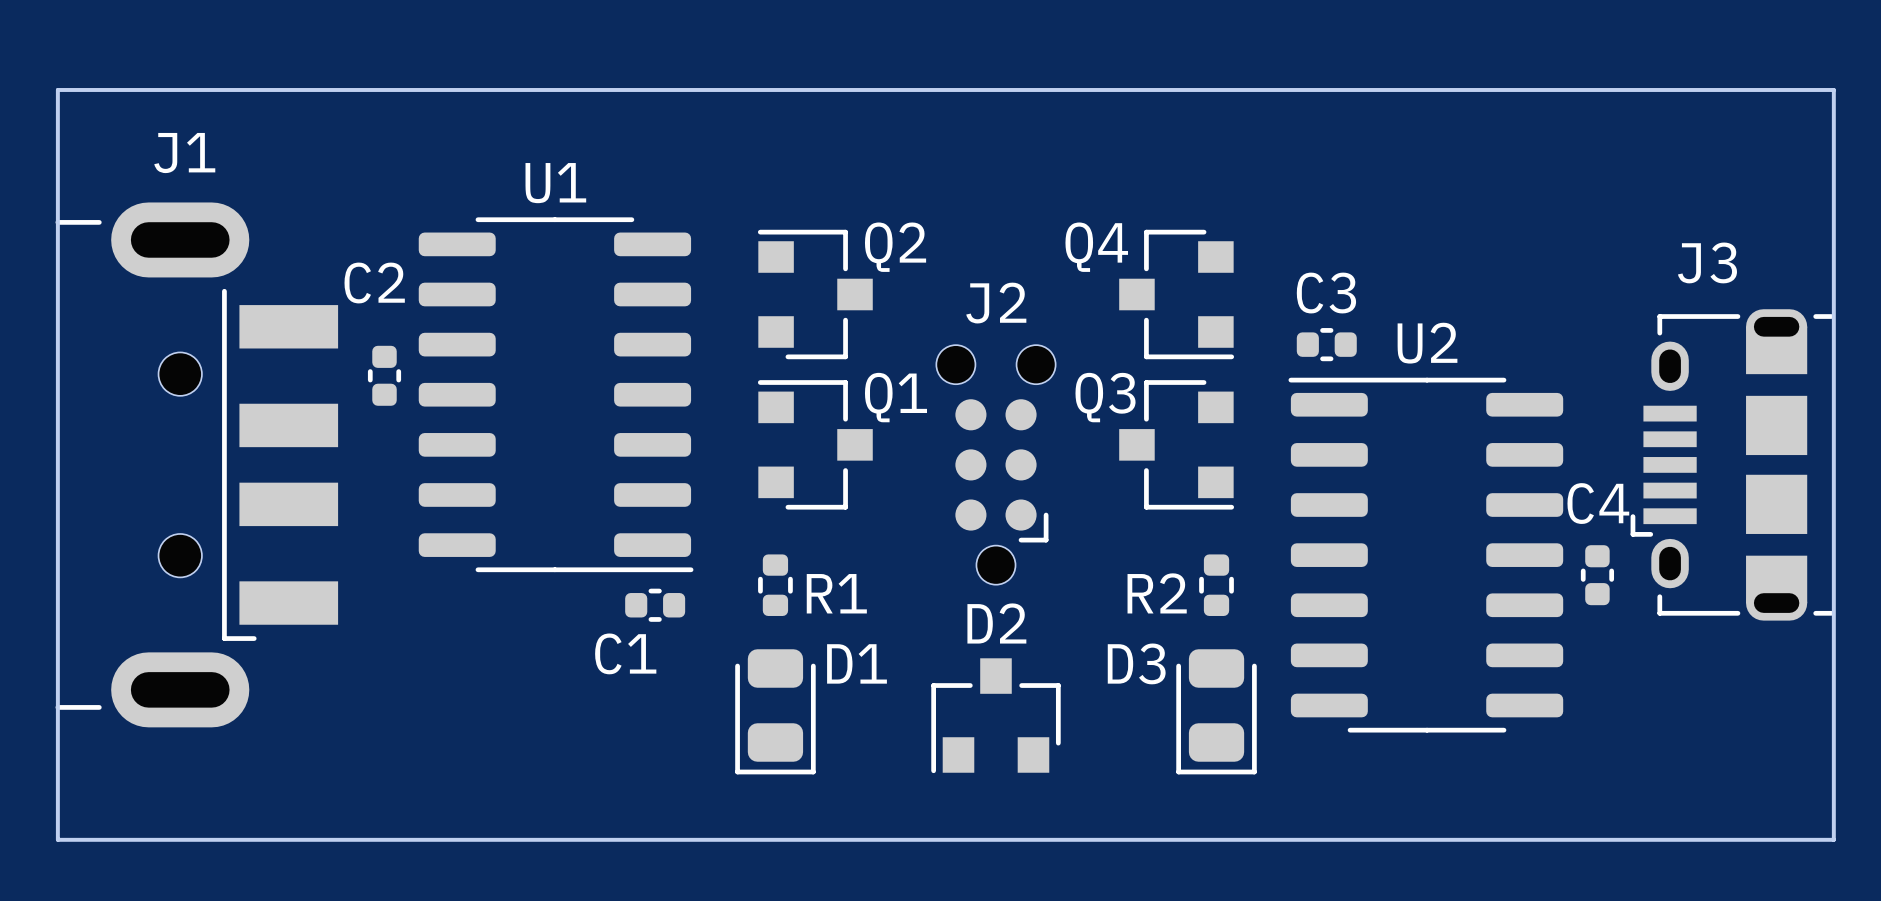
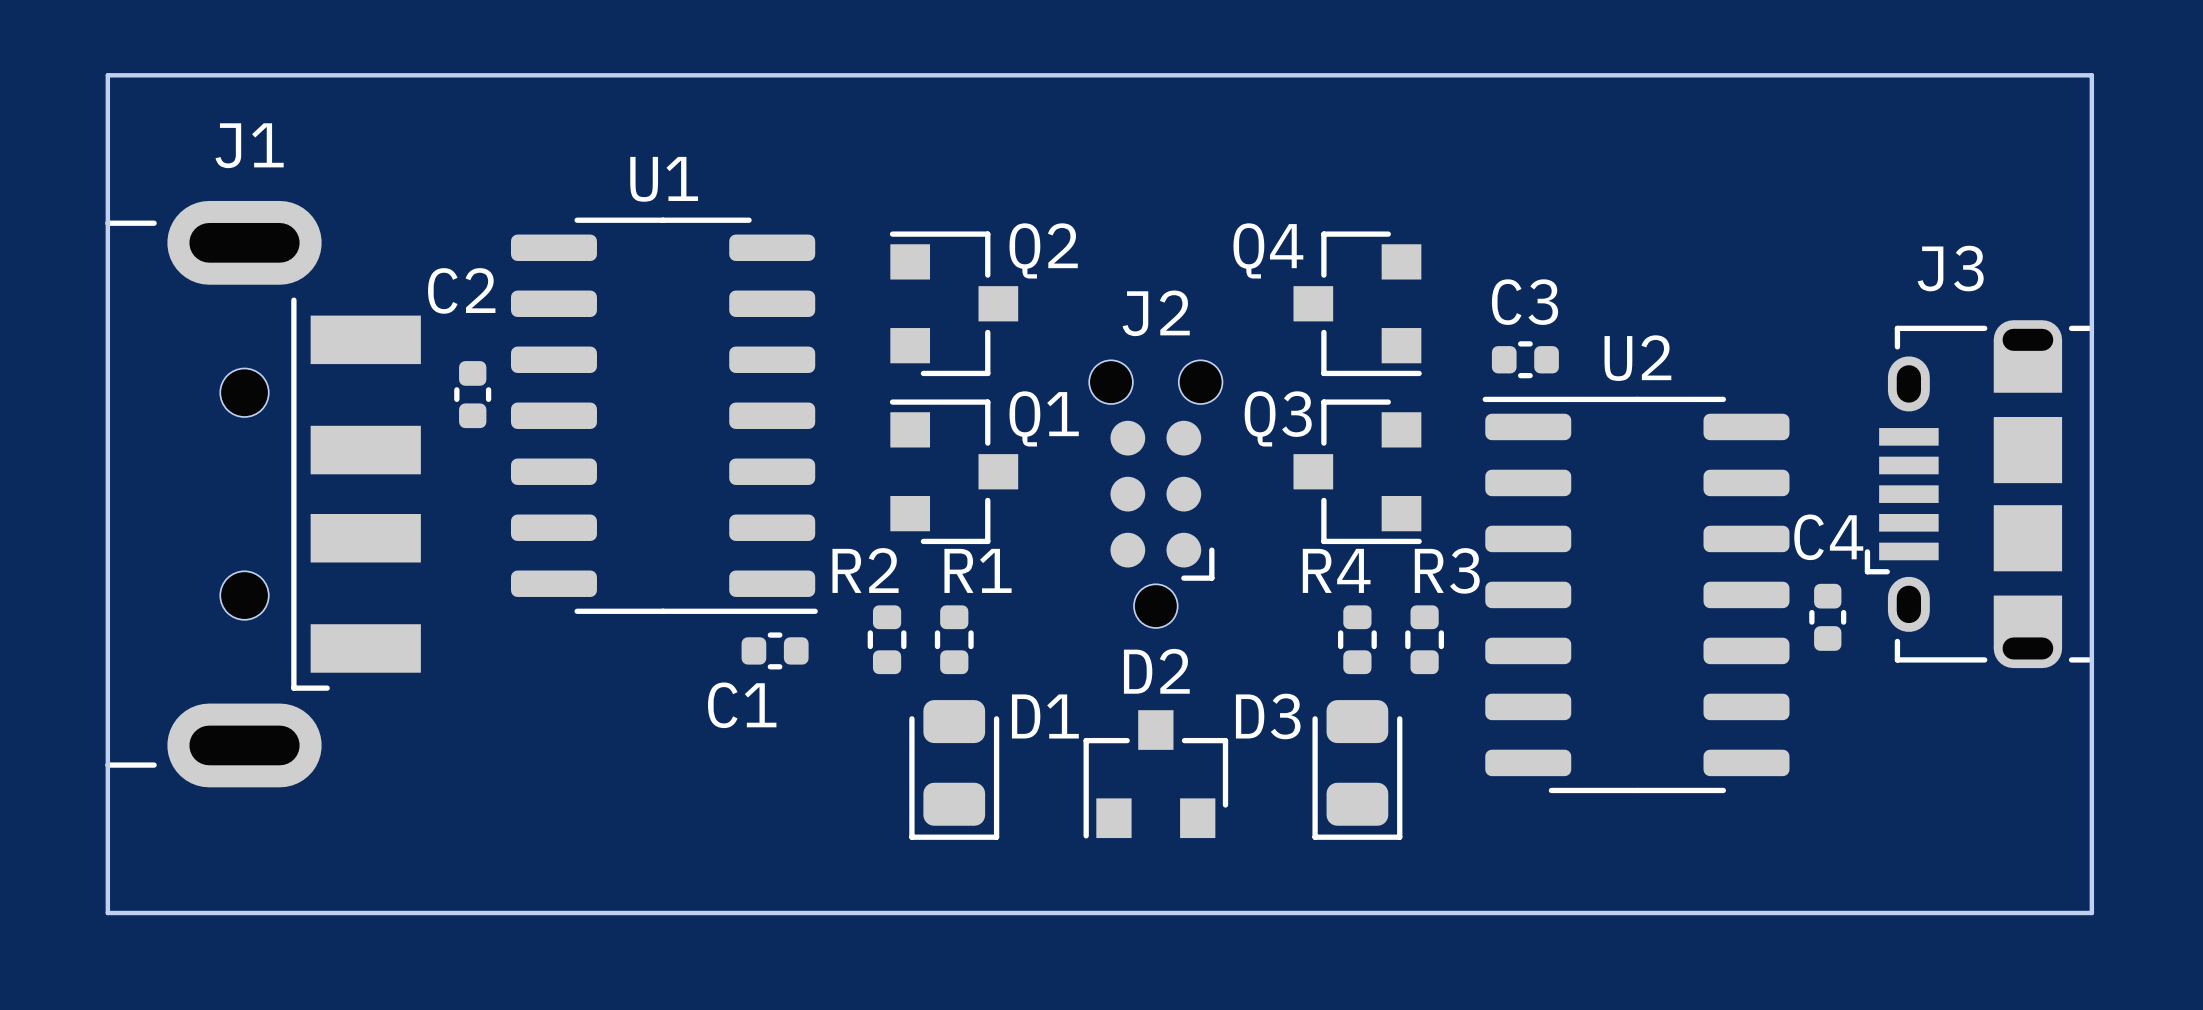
R1 position: (775, 585) -> (954, 639)
R2 position: (1216, 585) -> (887, 639)
R1 name position: R1 (836, 593) -> R1 (978, 570)
R2 name position: R2 (1157, 593) -> R2 (865, 570)
R4: none -> (1357, 639)
R3: none -> (1424, 639)
D1 position: (775, 711) -> (954, 769)
D3 position: (1216, 711) -> (1357, 769)

